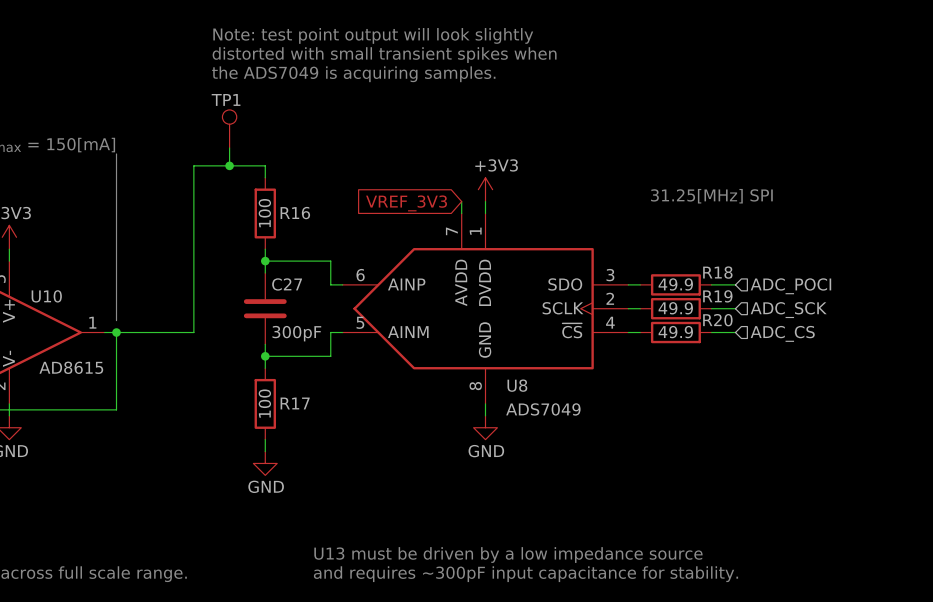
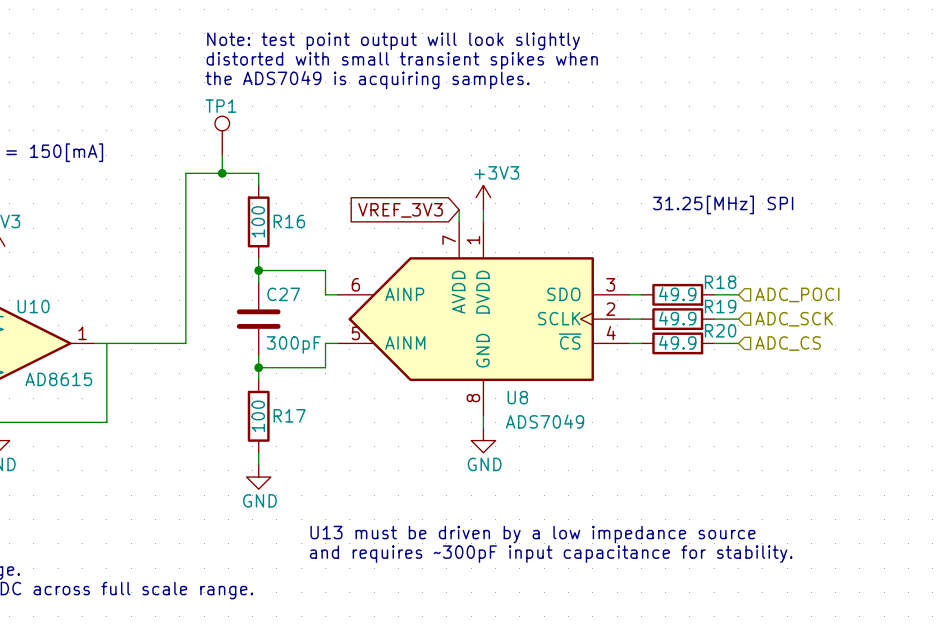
line: (116, 153) (116, 320) -> none
junction: (116, 332) -> none
text position: U13 must be driven by a low impedance source (508, 555) -> U13 must be driven by a low impedance source (532, 534)
text position: and requires ~300pF input capacitance for stability. (525, 574) -> and requires ~300pF input capacitance for stability. (551, 554)

